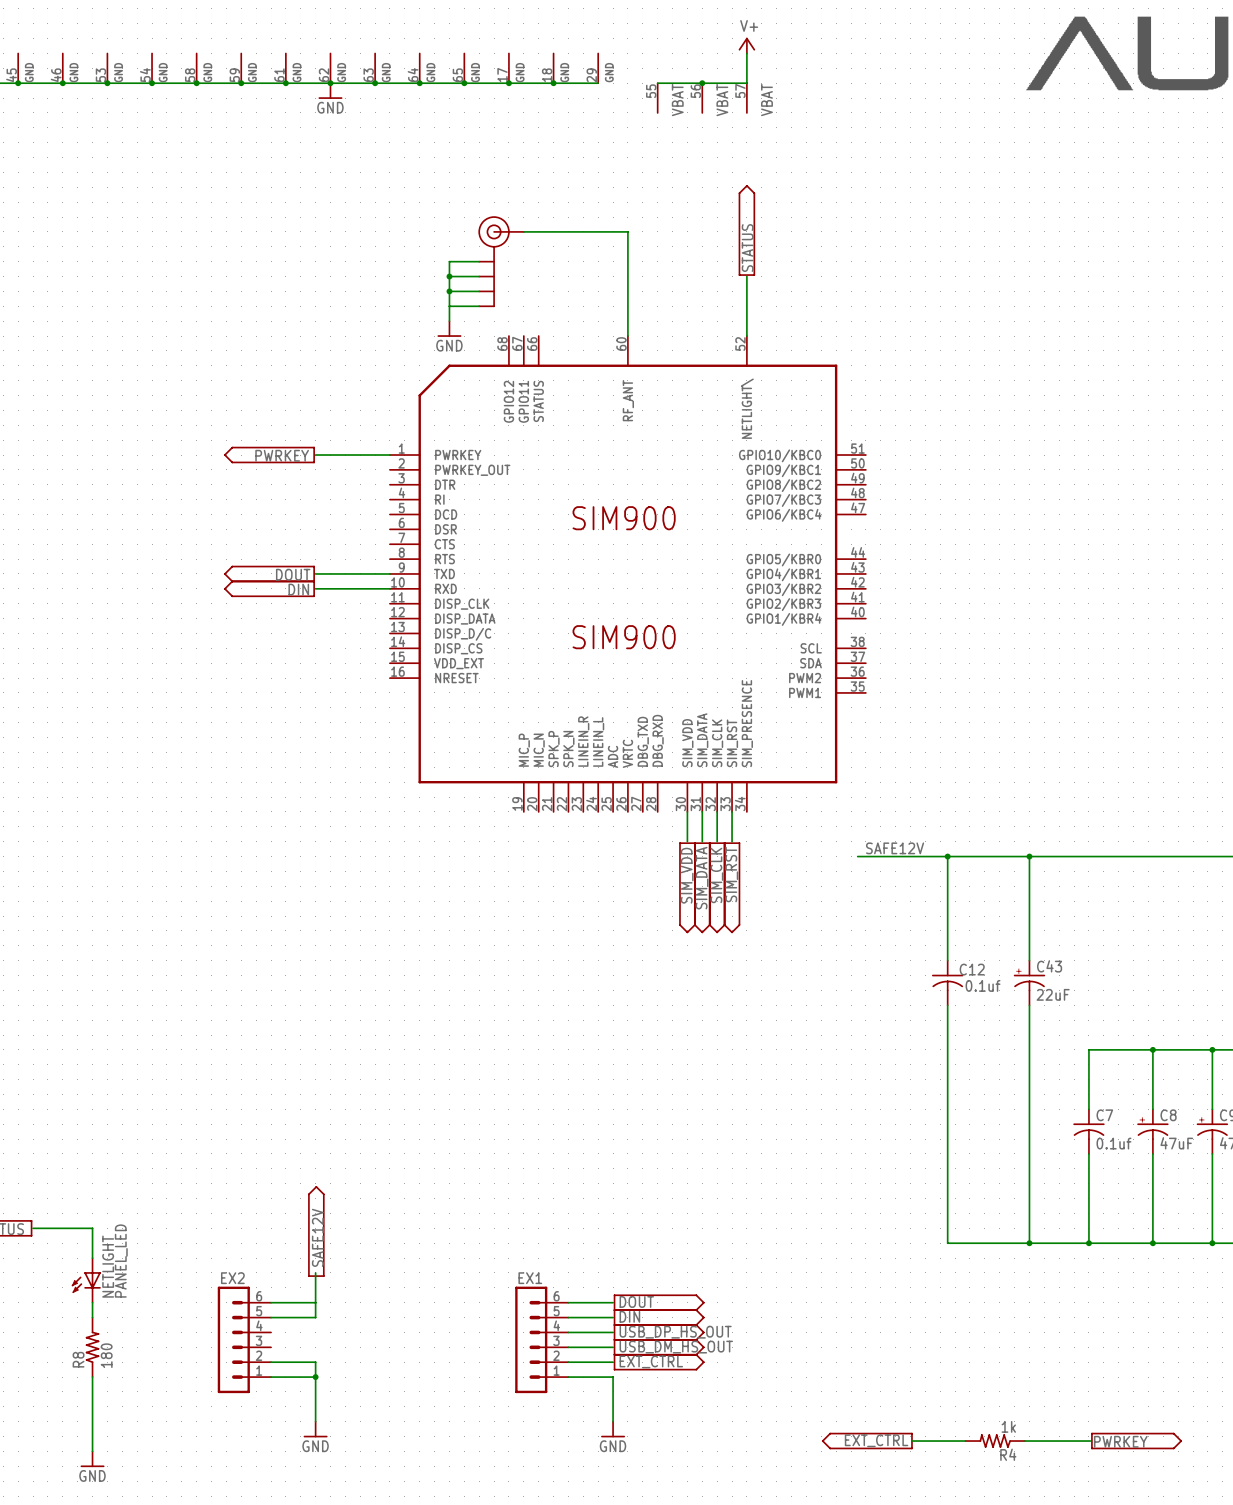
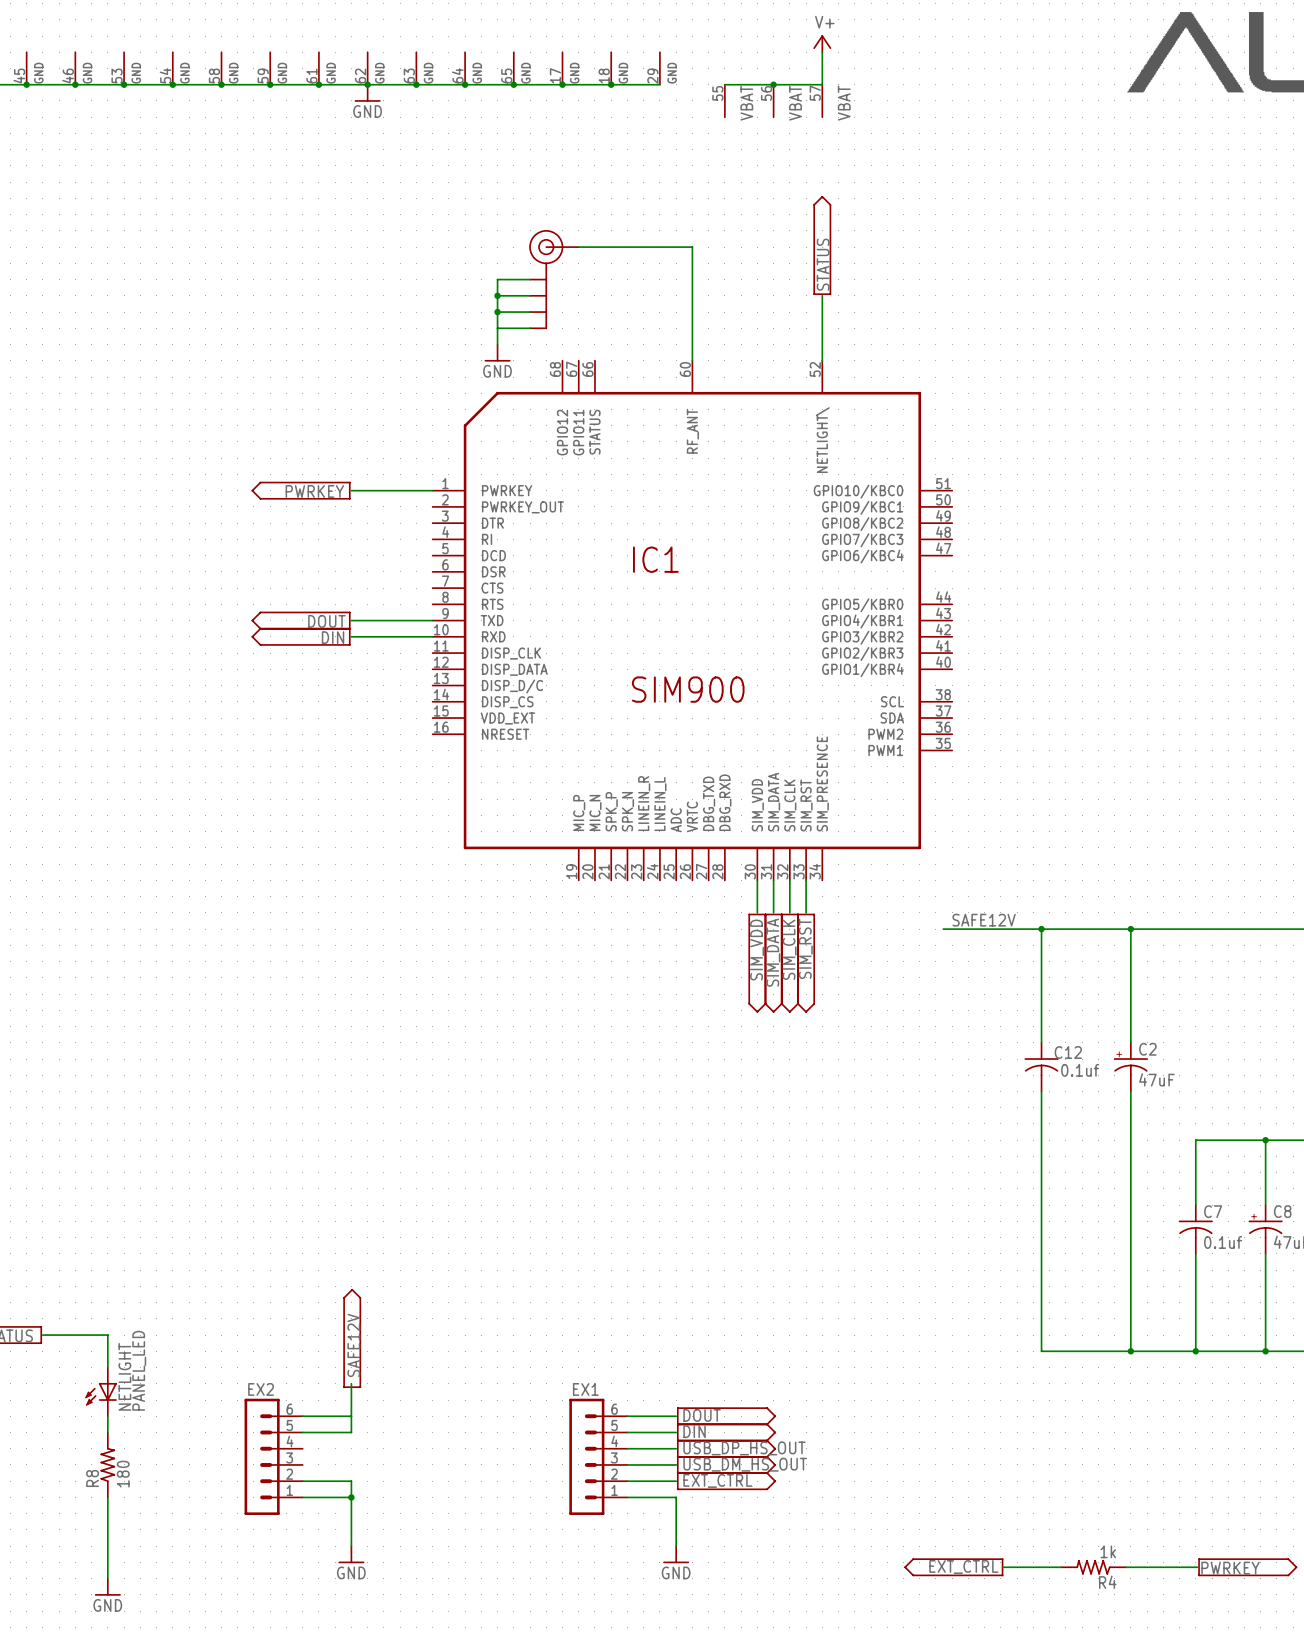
SIM900 name: SIM900 (624, 518) -> IC1 (655, 559)
C43 name: C43 (1049, 966) -> C2 (1147, 1049)
C43 value: 22uF (1053, 994) -> 47uF (1156, 1079)

